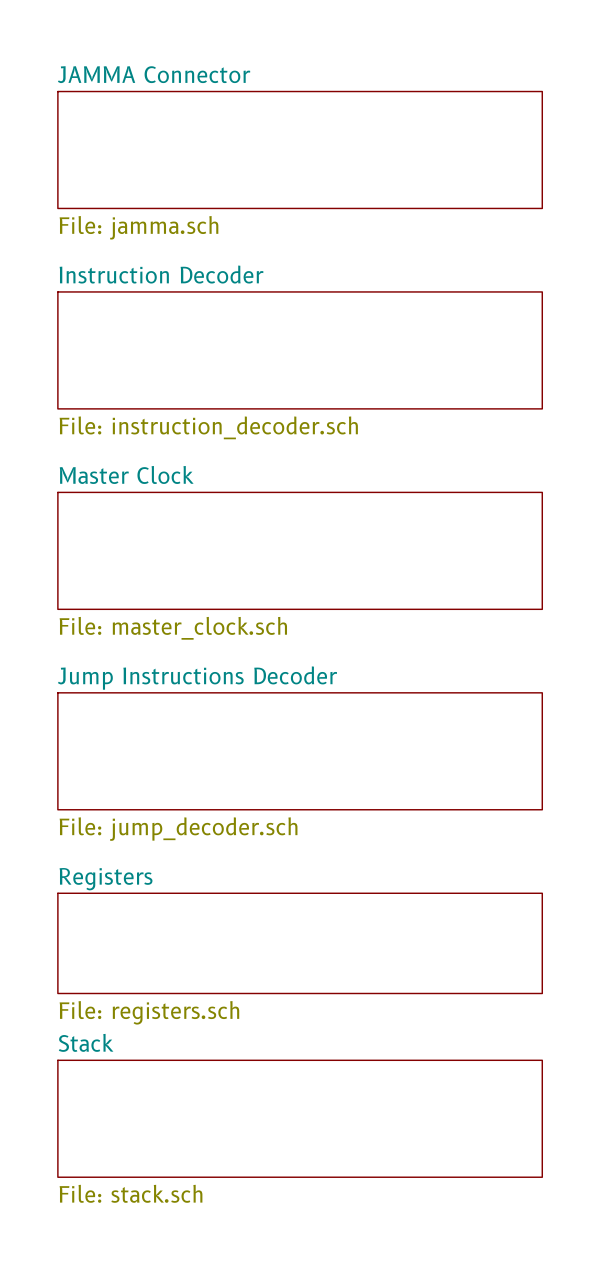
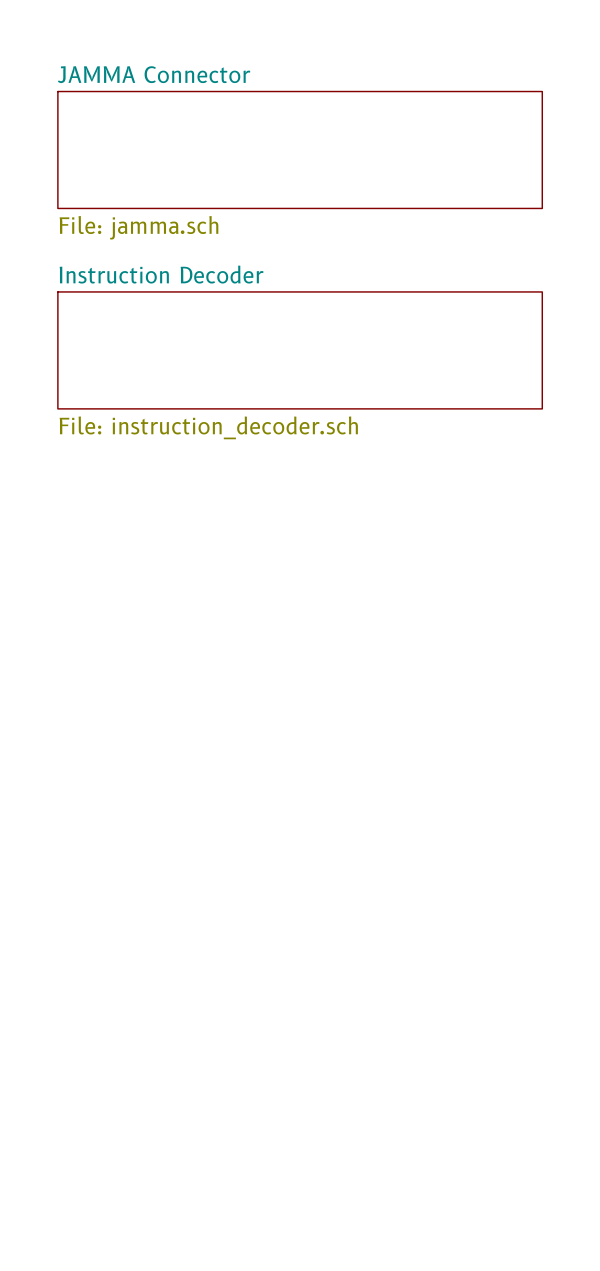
sheet Master Clock: File: master_clock.sch (300, 550) -> none
sheet Jump Instructions Decoder: File: jump_decoder.sch (300, 751) -> none
sheet Registers: File: registers.sch (300, 943) -> none
sheet Stack: File: stack.sch (300, 1118) -> none

